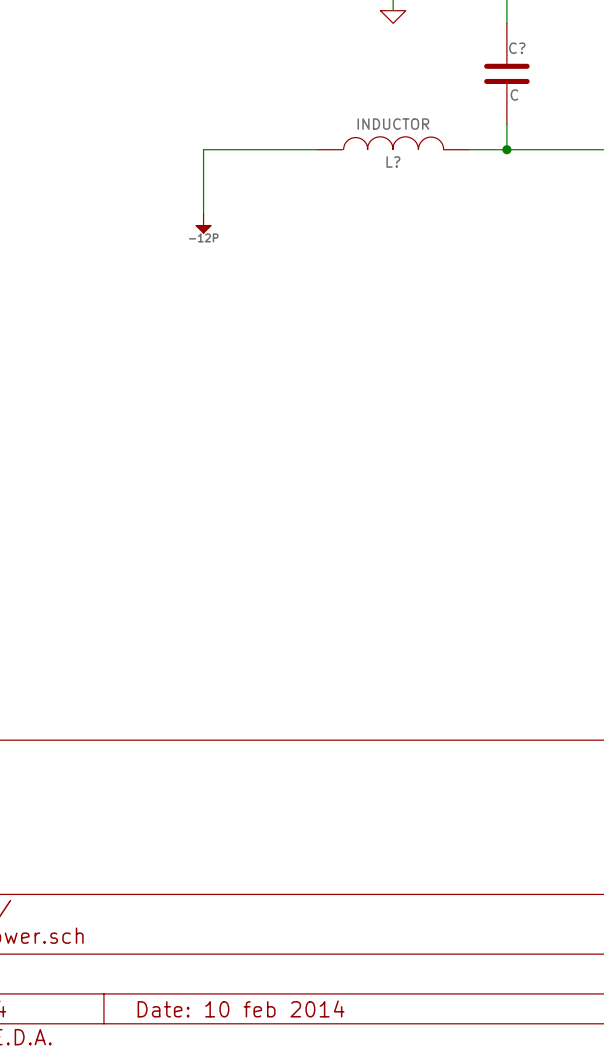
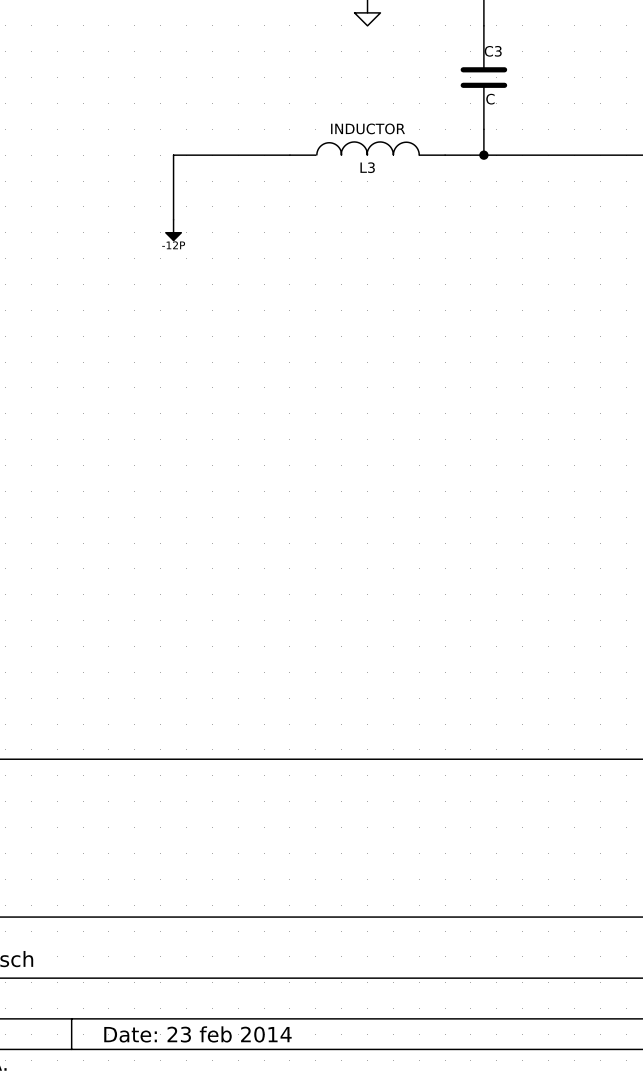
C? name: C? (517, 48) -> C3 (493, 51)
L? name: L? (393, 161) -> L3 (367, 167)
title block: Date: 10 feb 2014 (241, 1008) -> Date: 23 feb 2014 (197, 1034)

